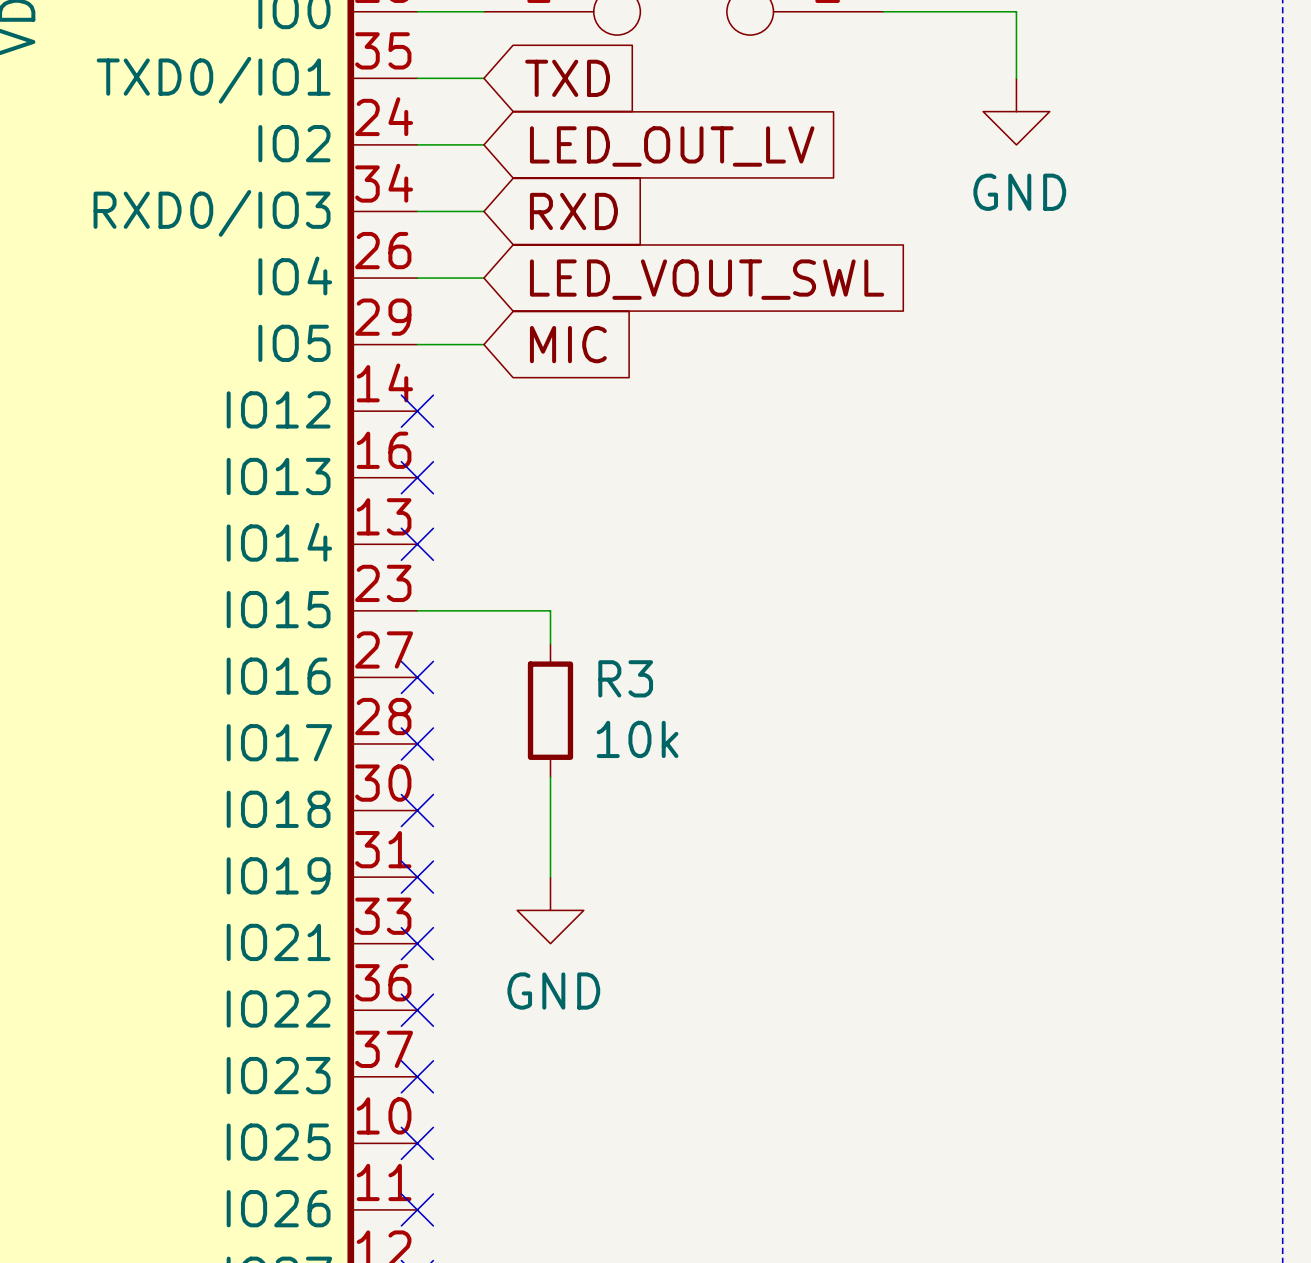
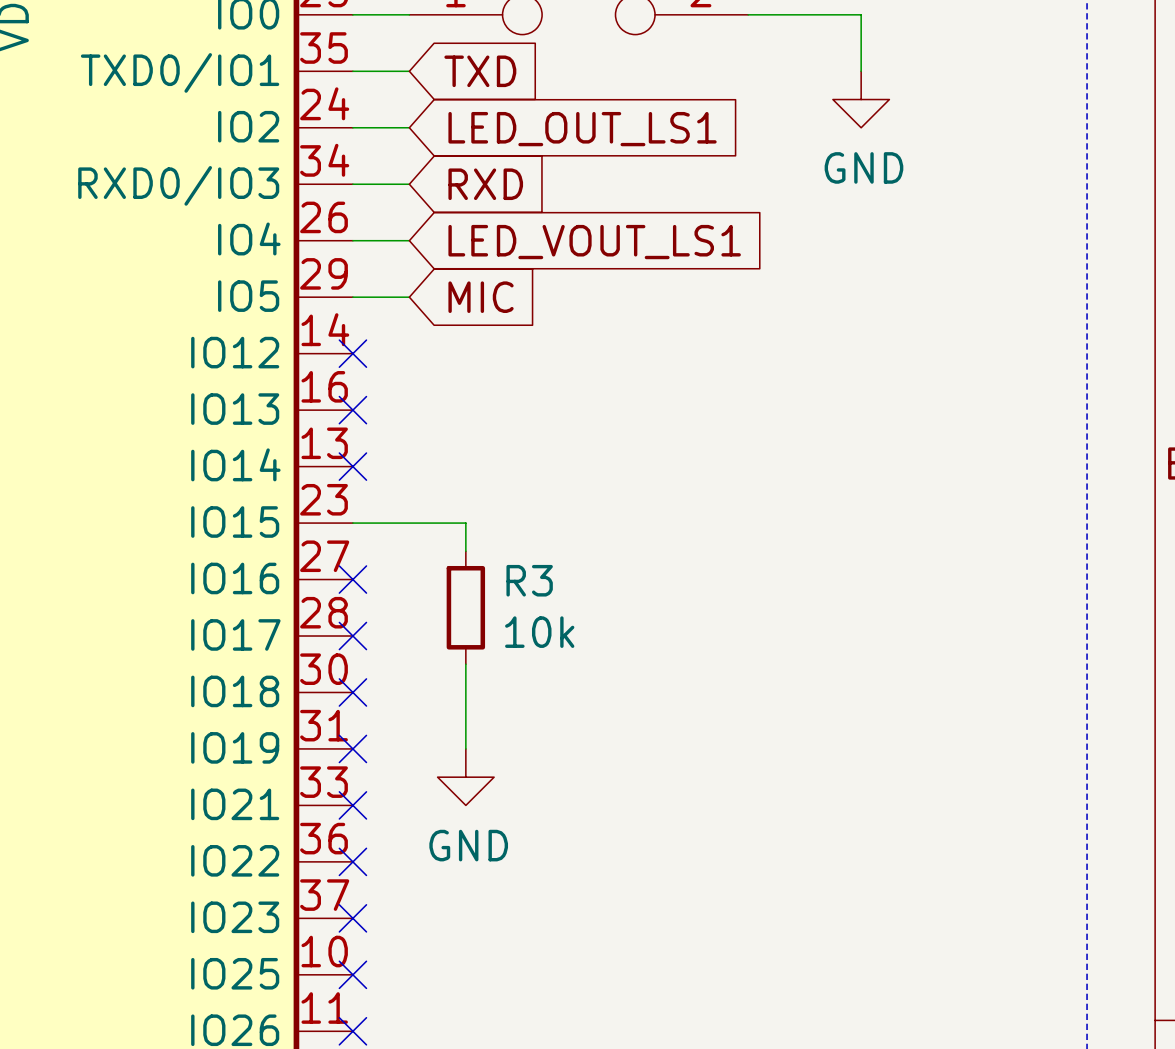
global label: LED_OUT_LV (672, 146) -> LED_OUT_LS1 (582, 129)
global label: LED_VOUT_SWL (707, 279) -> LED_VOUT_LS1 (594, 242)

